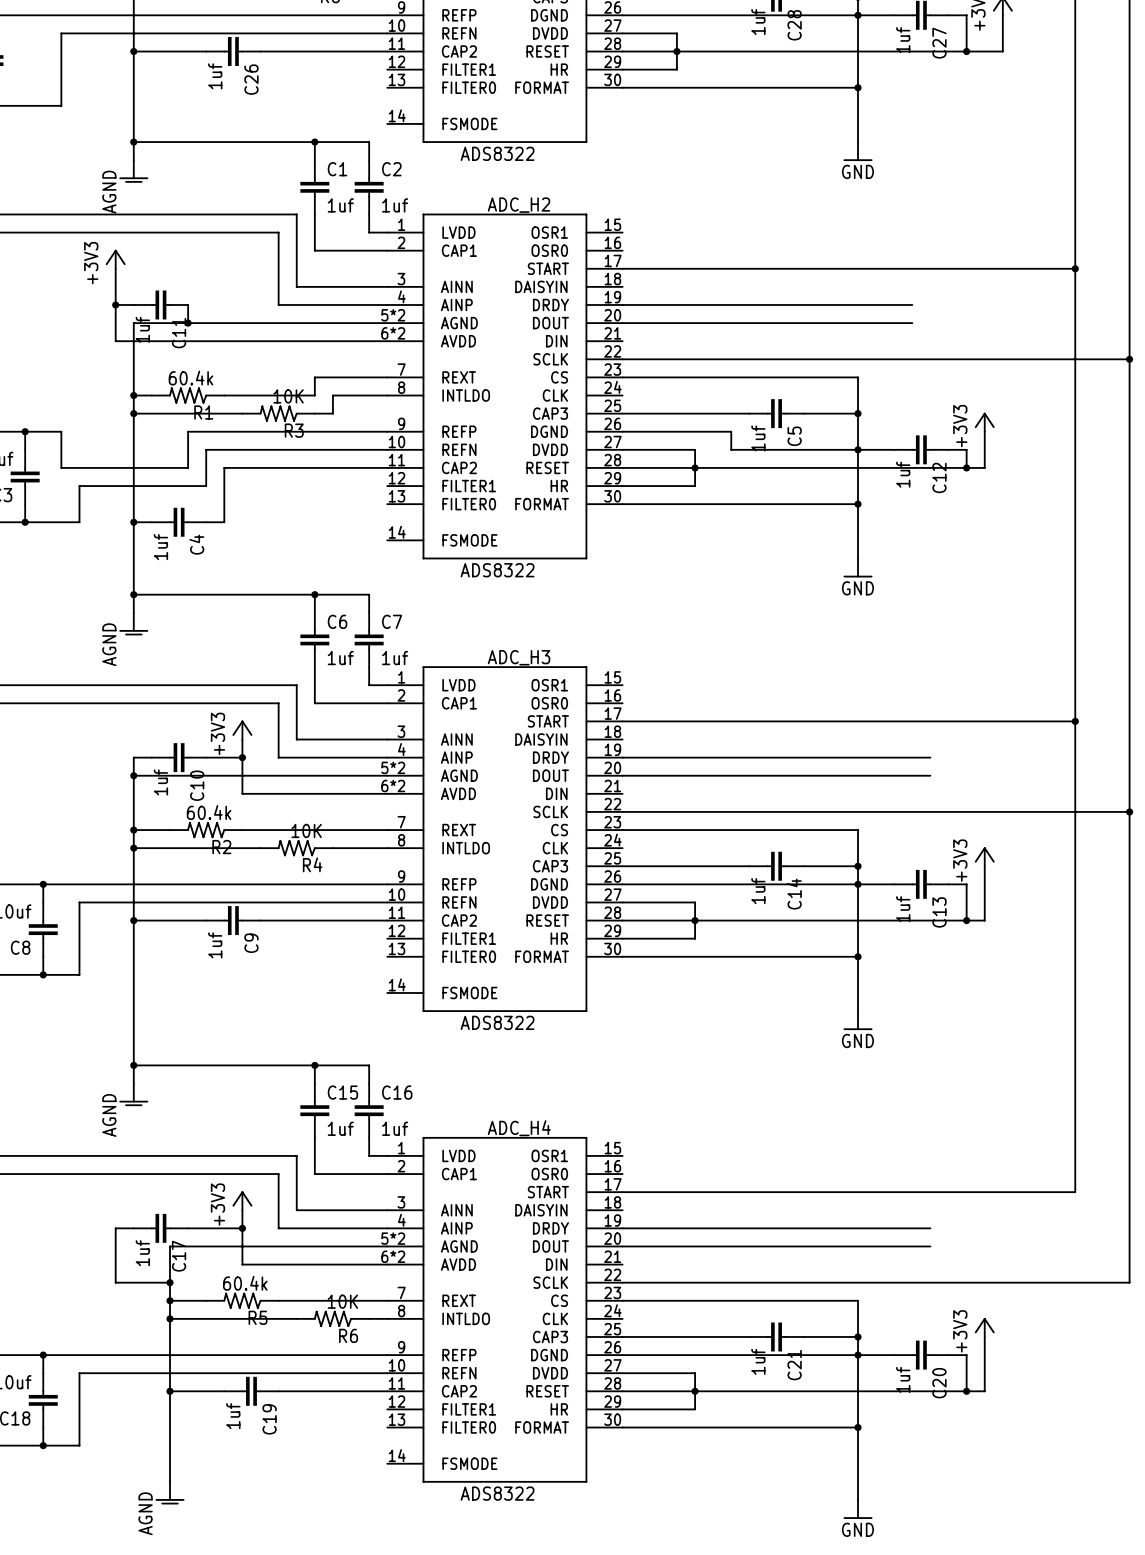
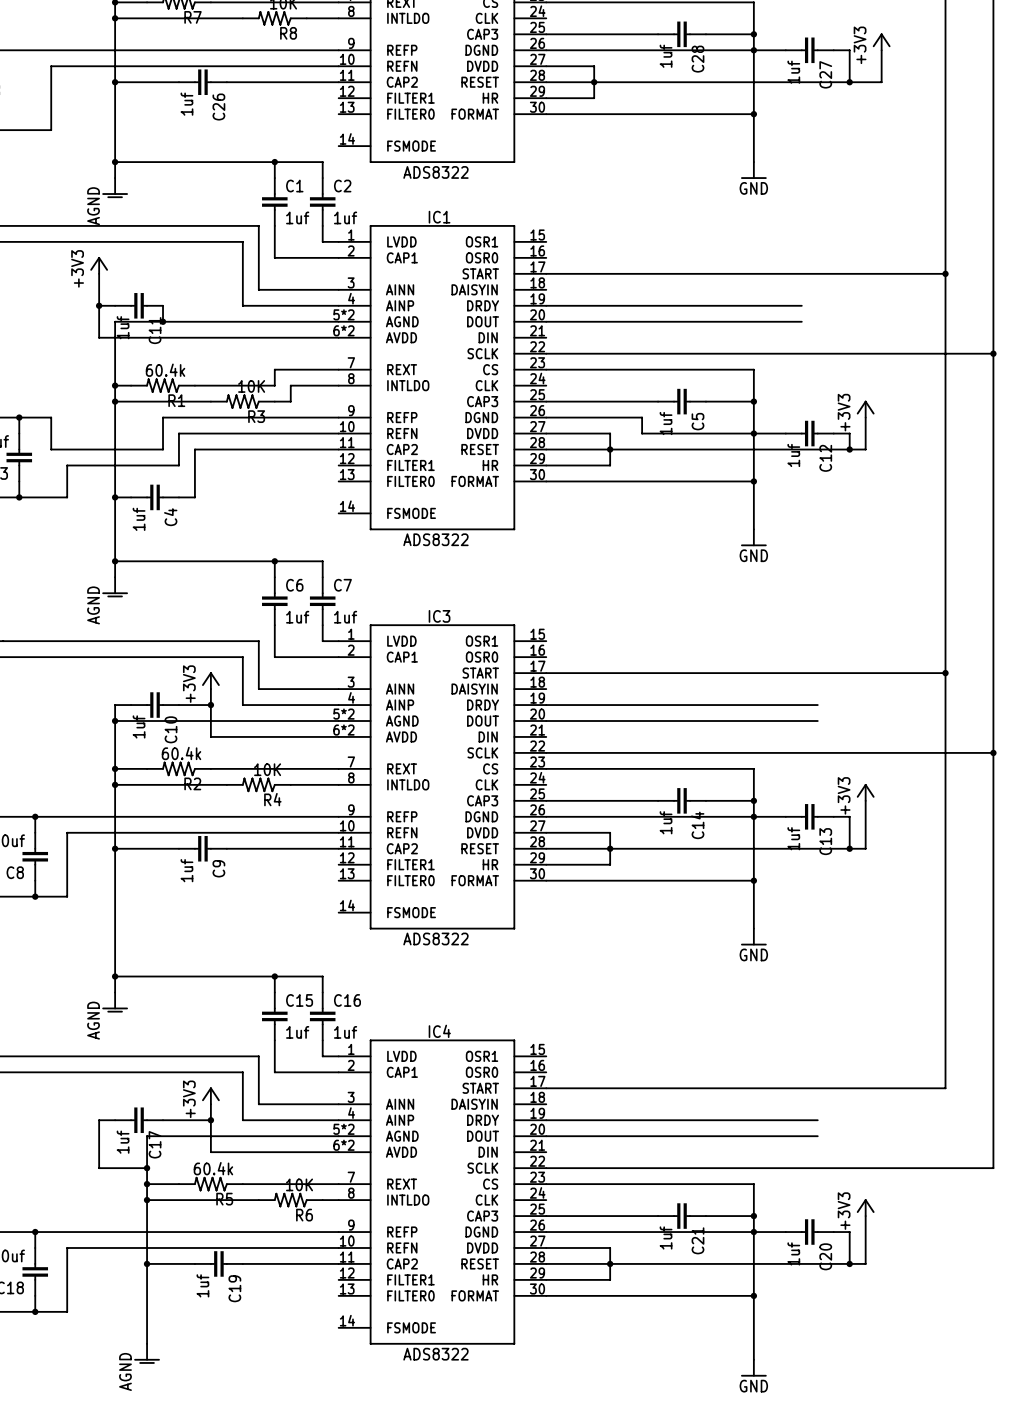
ADC_H2 name: ADC_H2 (519, 205) -> IC1 (439, 217)
ADC_H3 name: ADC_H3 (519, 657) -> IC3 (439, 616)
ADC_H4 name: ADC_H4 (519, 1128) -> IC4 (439, 1031)

